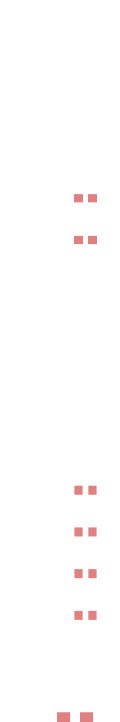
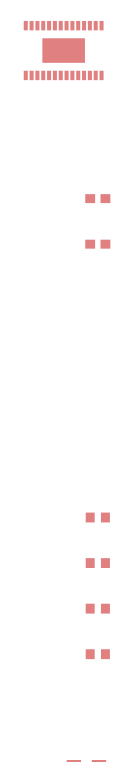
part: none -> (63, 50)

